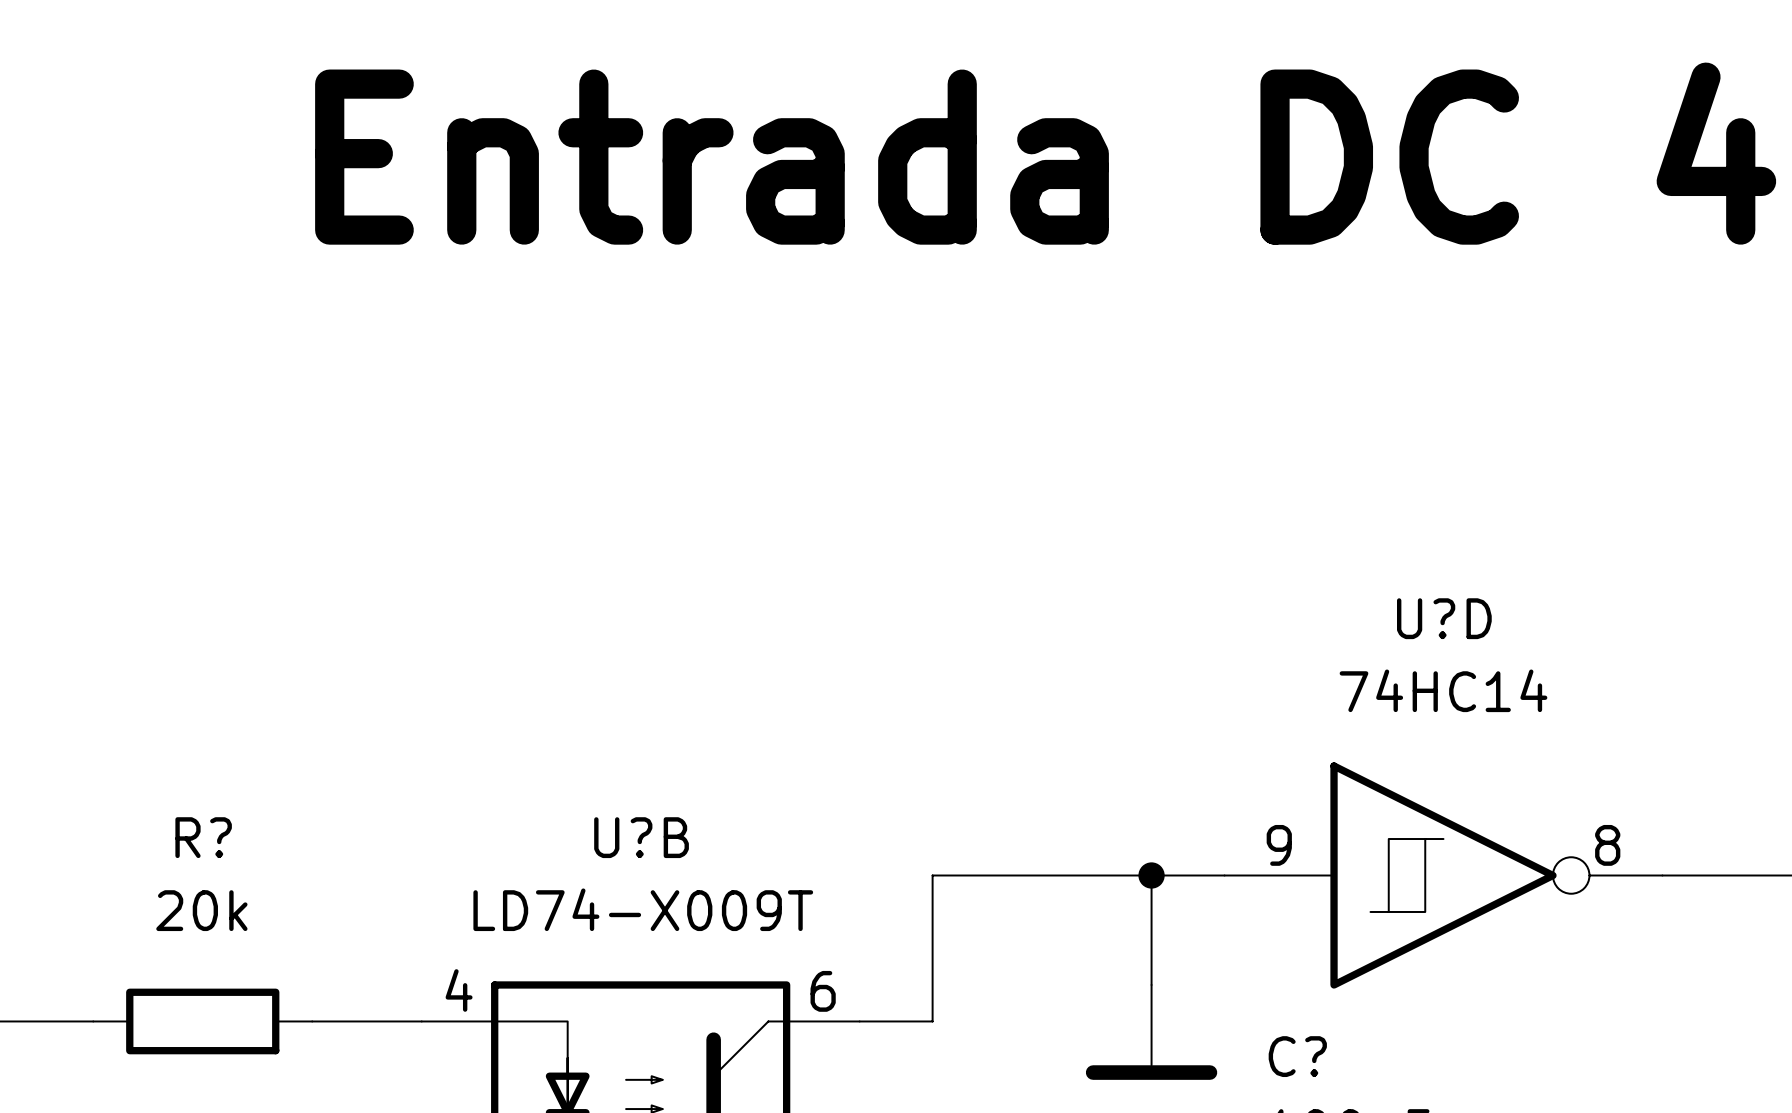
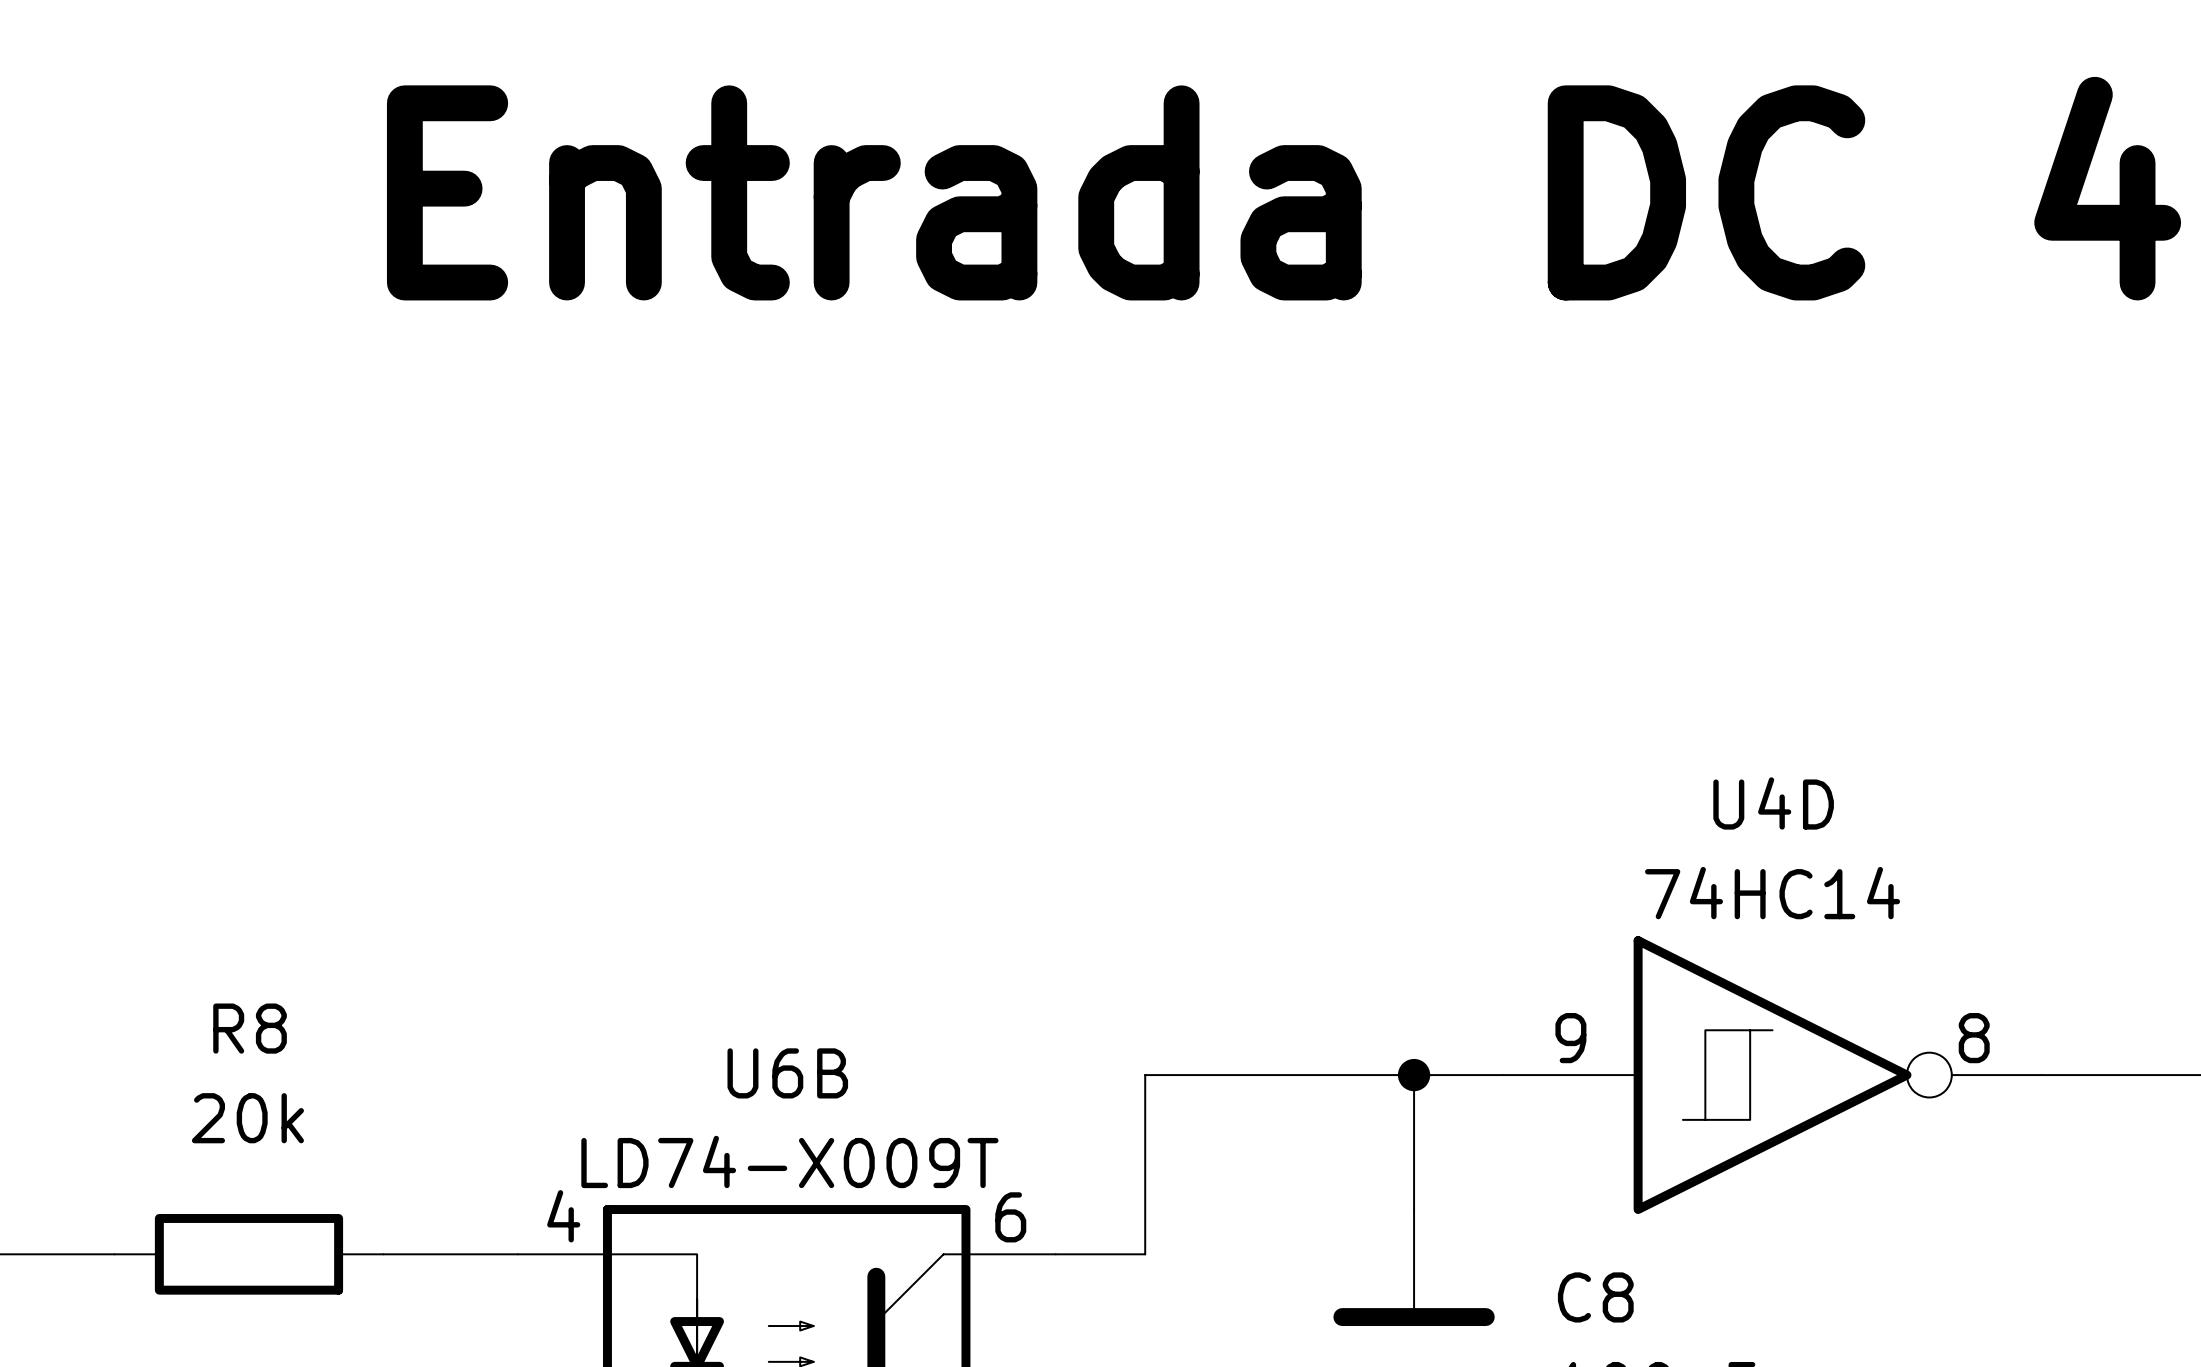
U?D name: U?D (1444, 618) -> U4D (1773, 803)
U?D value position: 74HC14 (1443, 690) -> 74HC14 (1772, 893)
R? name: R? (203, 837) -> R8 (250, 1028)
U?B name: U?B (641, 837) -> U6B (787, 1073)
U?B value position: LD74-X009T (643, 909) -> LD74-X009T (789, 1161)
C? name: C? (1297, 1056) -> C8 (1595, 1297)

